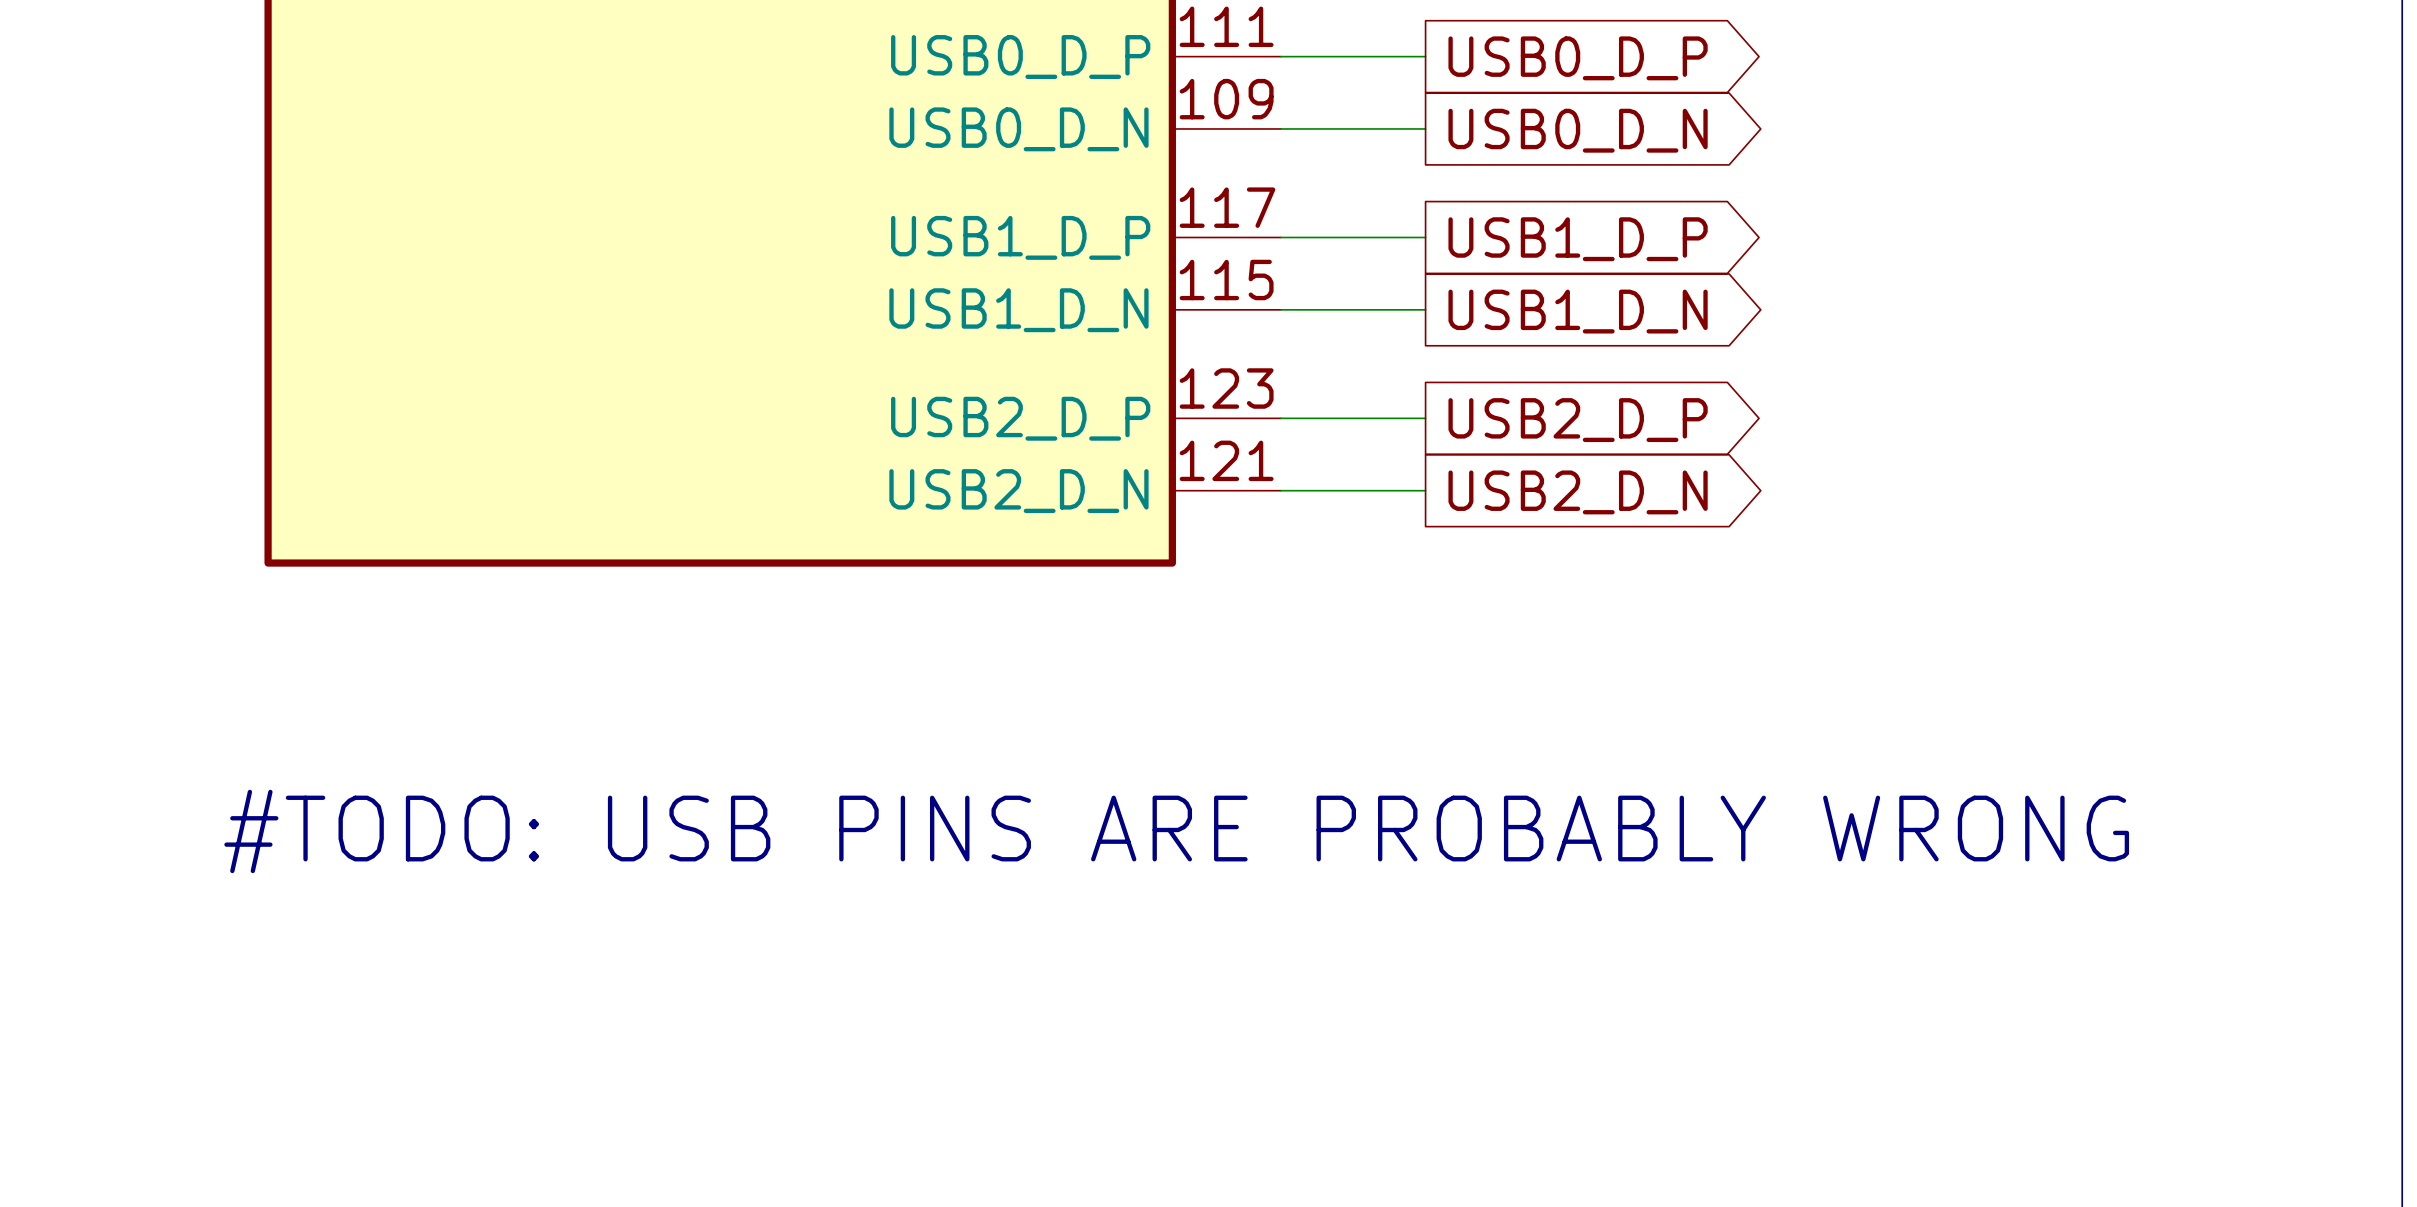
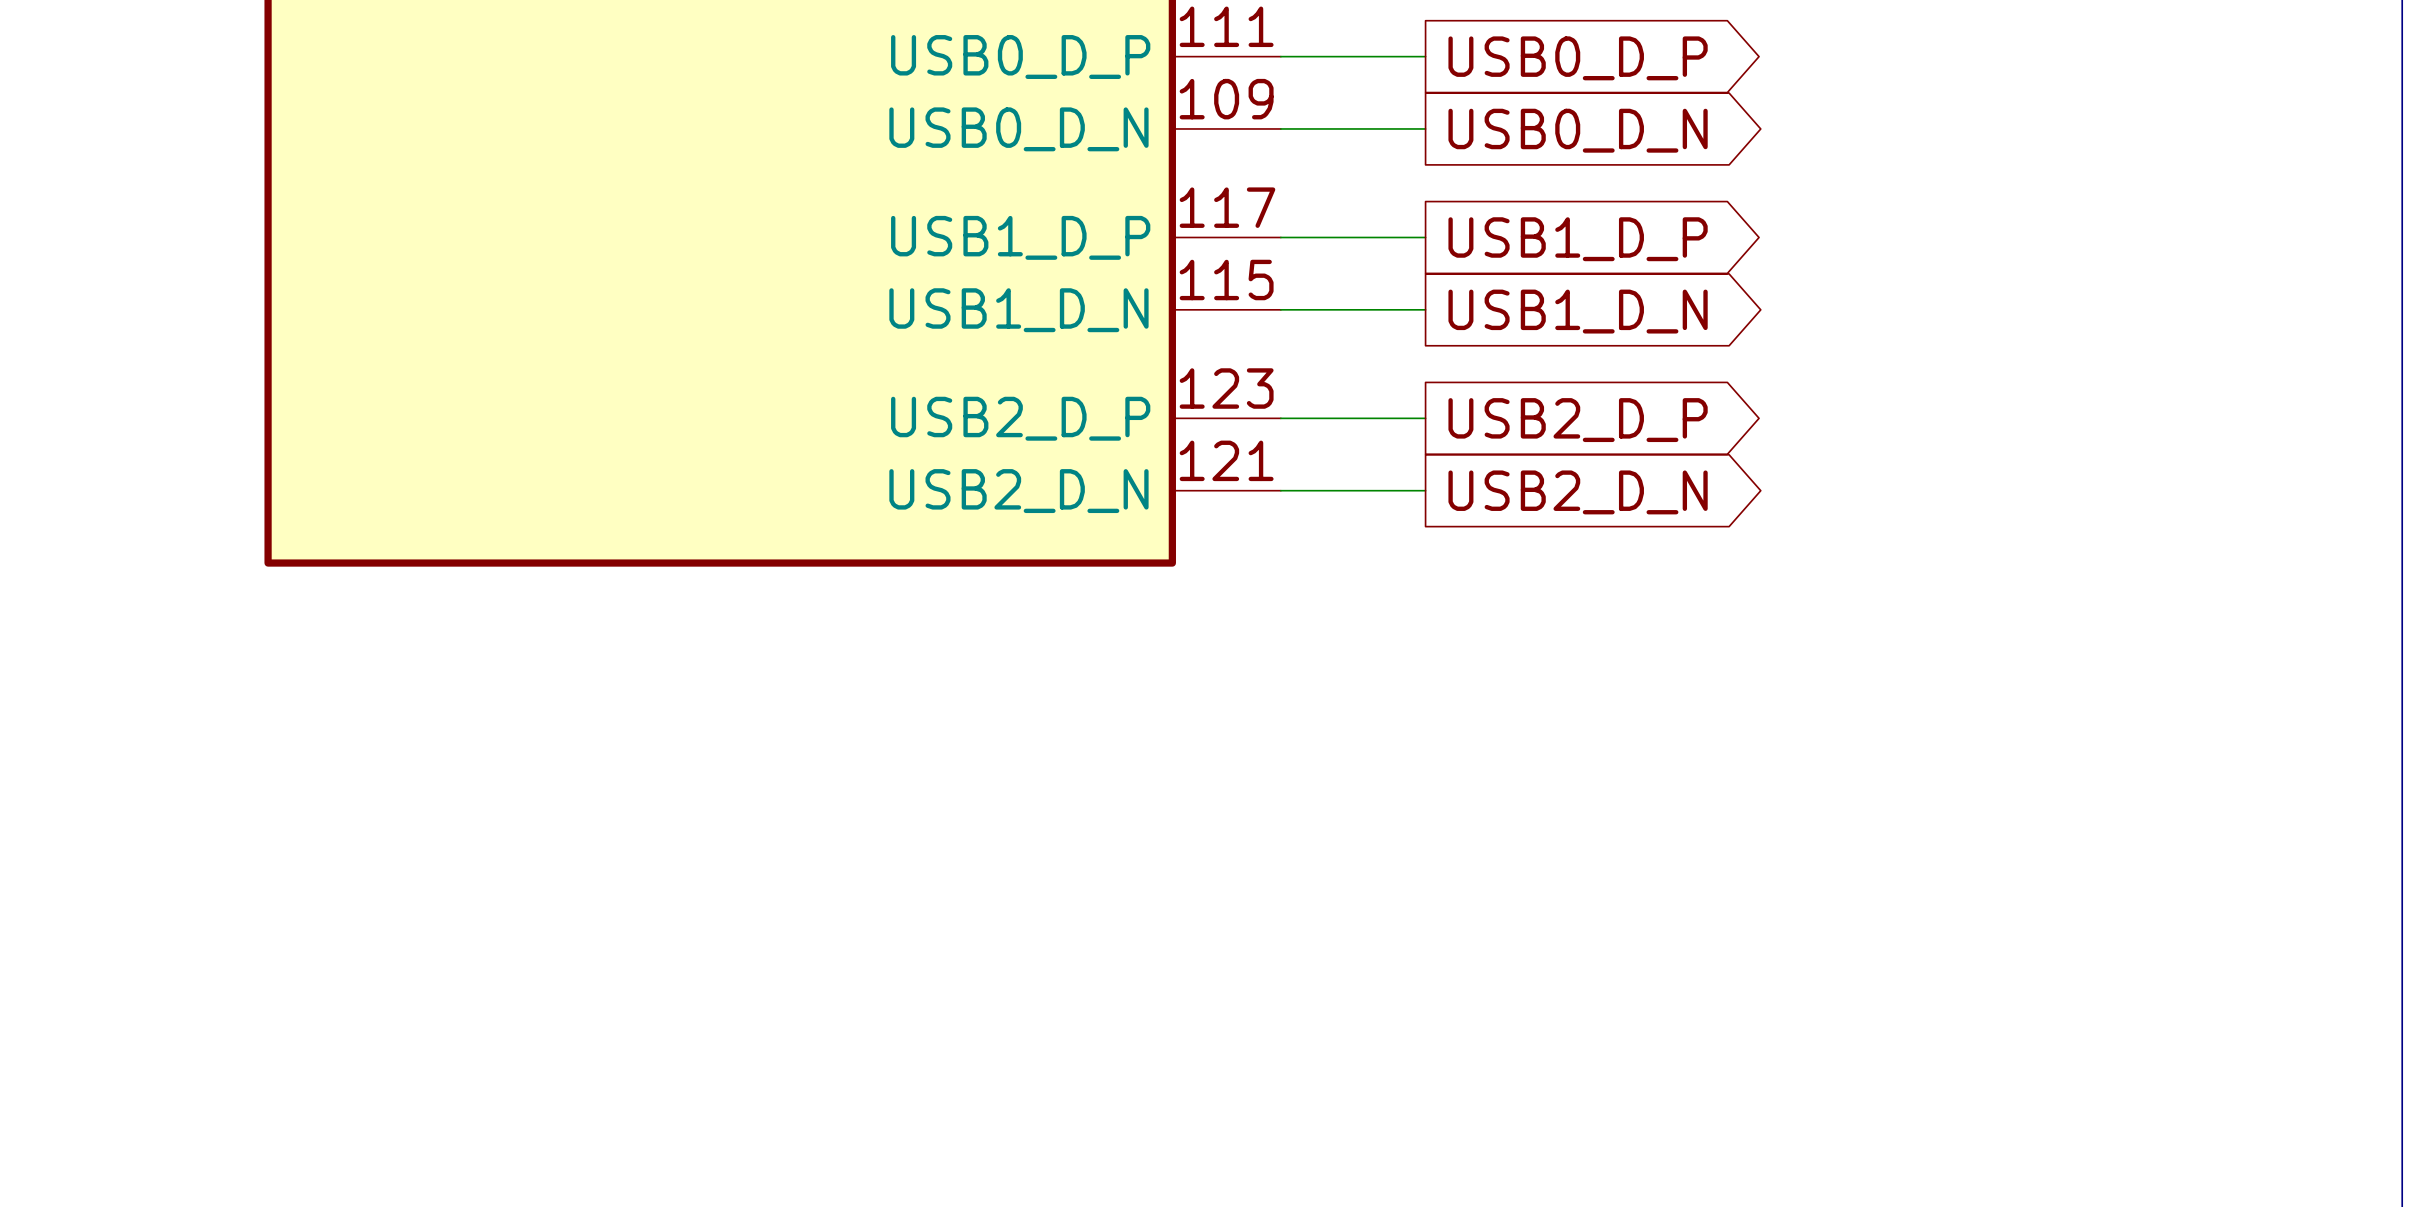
text: #TODO: USB PINS ARE PROBABLY WRONG (1176, 831) -> none

